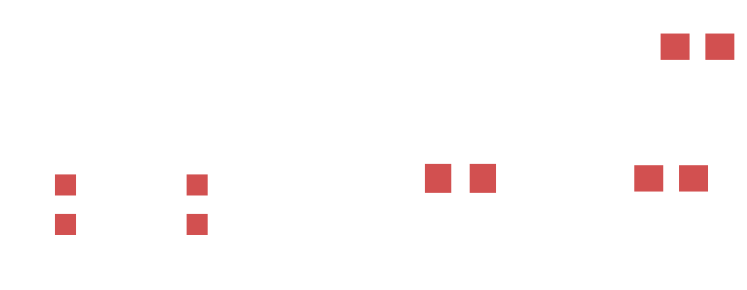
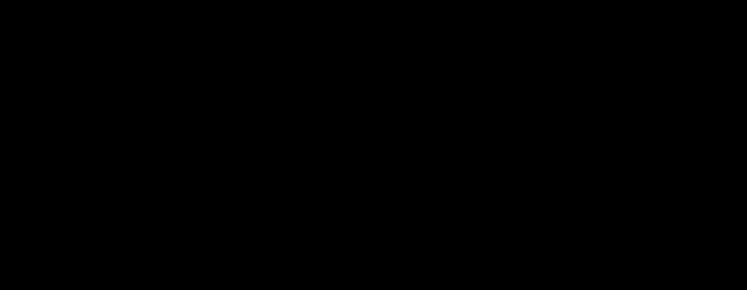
part: (697, 46) -> none
part: (460, 178) -> none
part: (671, 178) -> none
part: (65, 204) -> none
part: (197, 204) -> none

